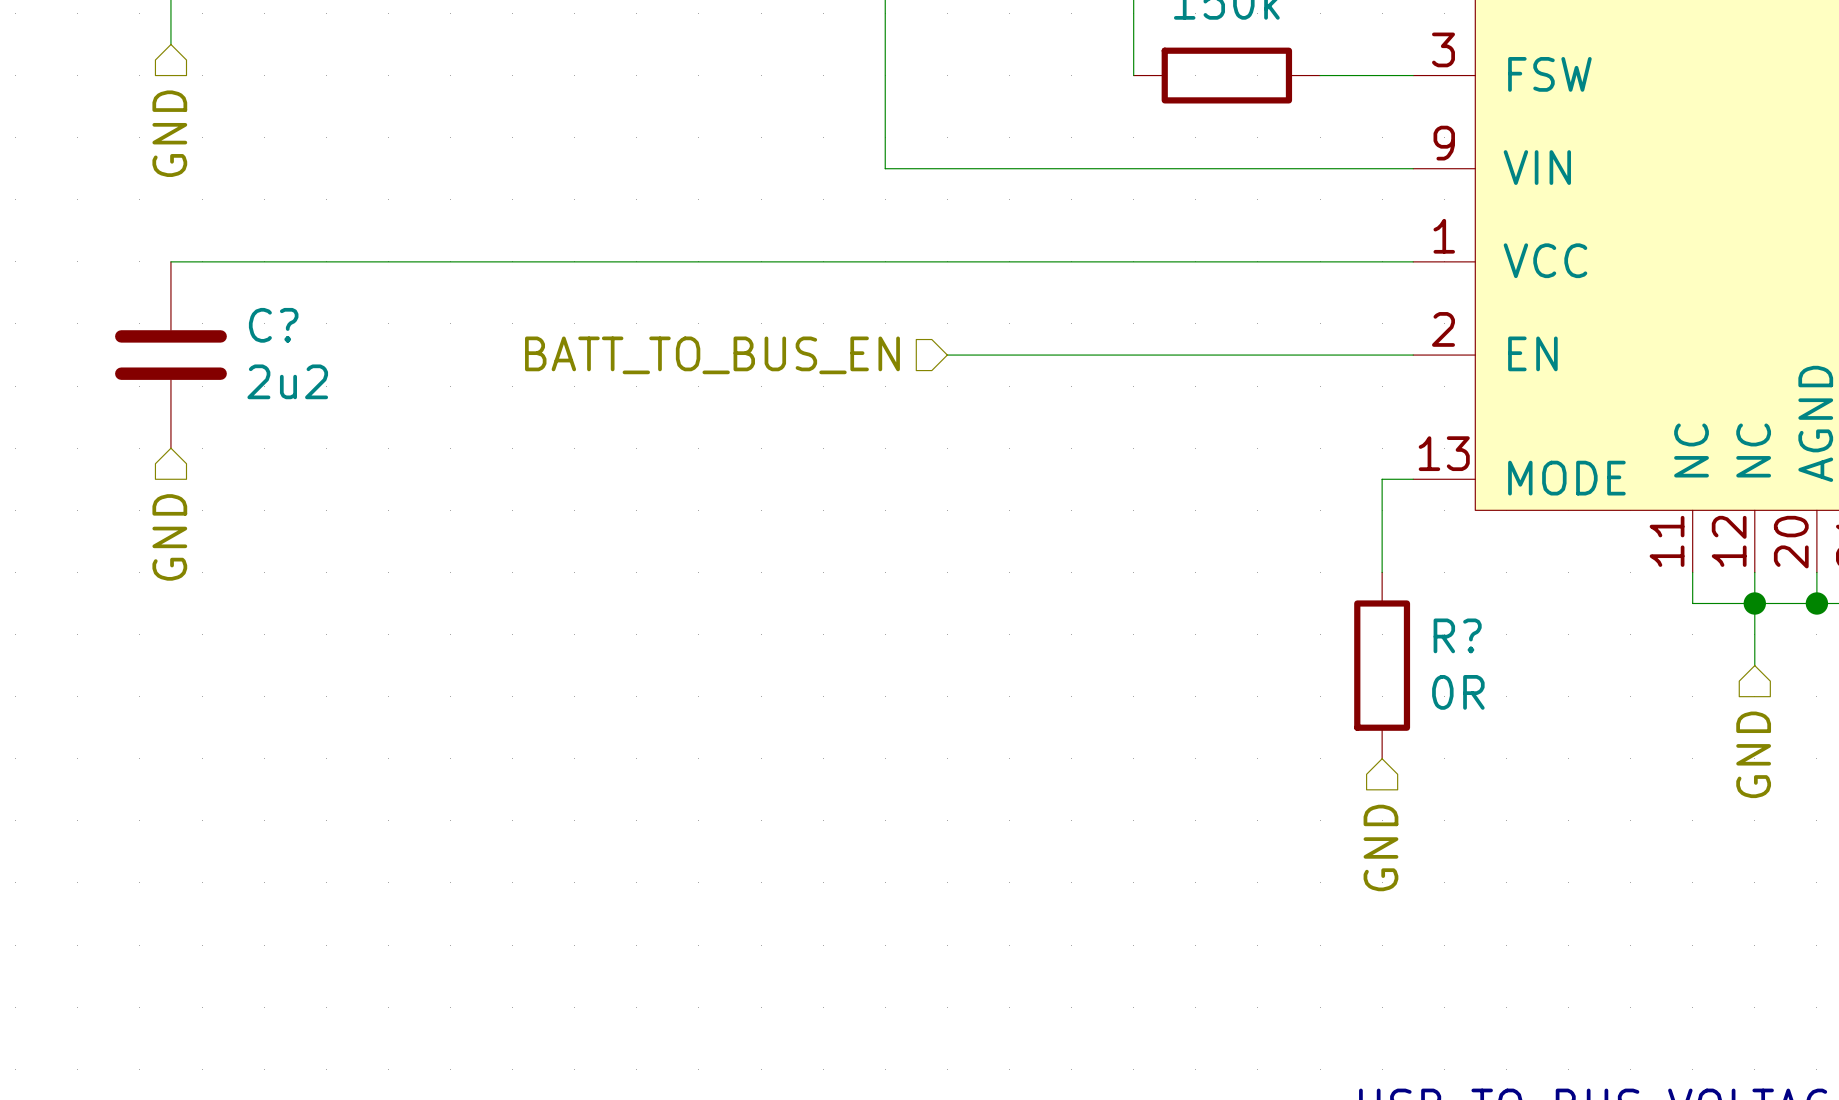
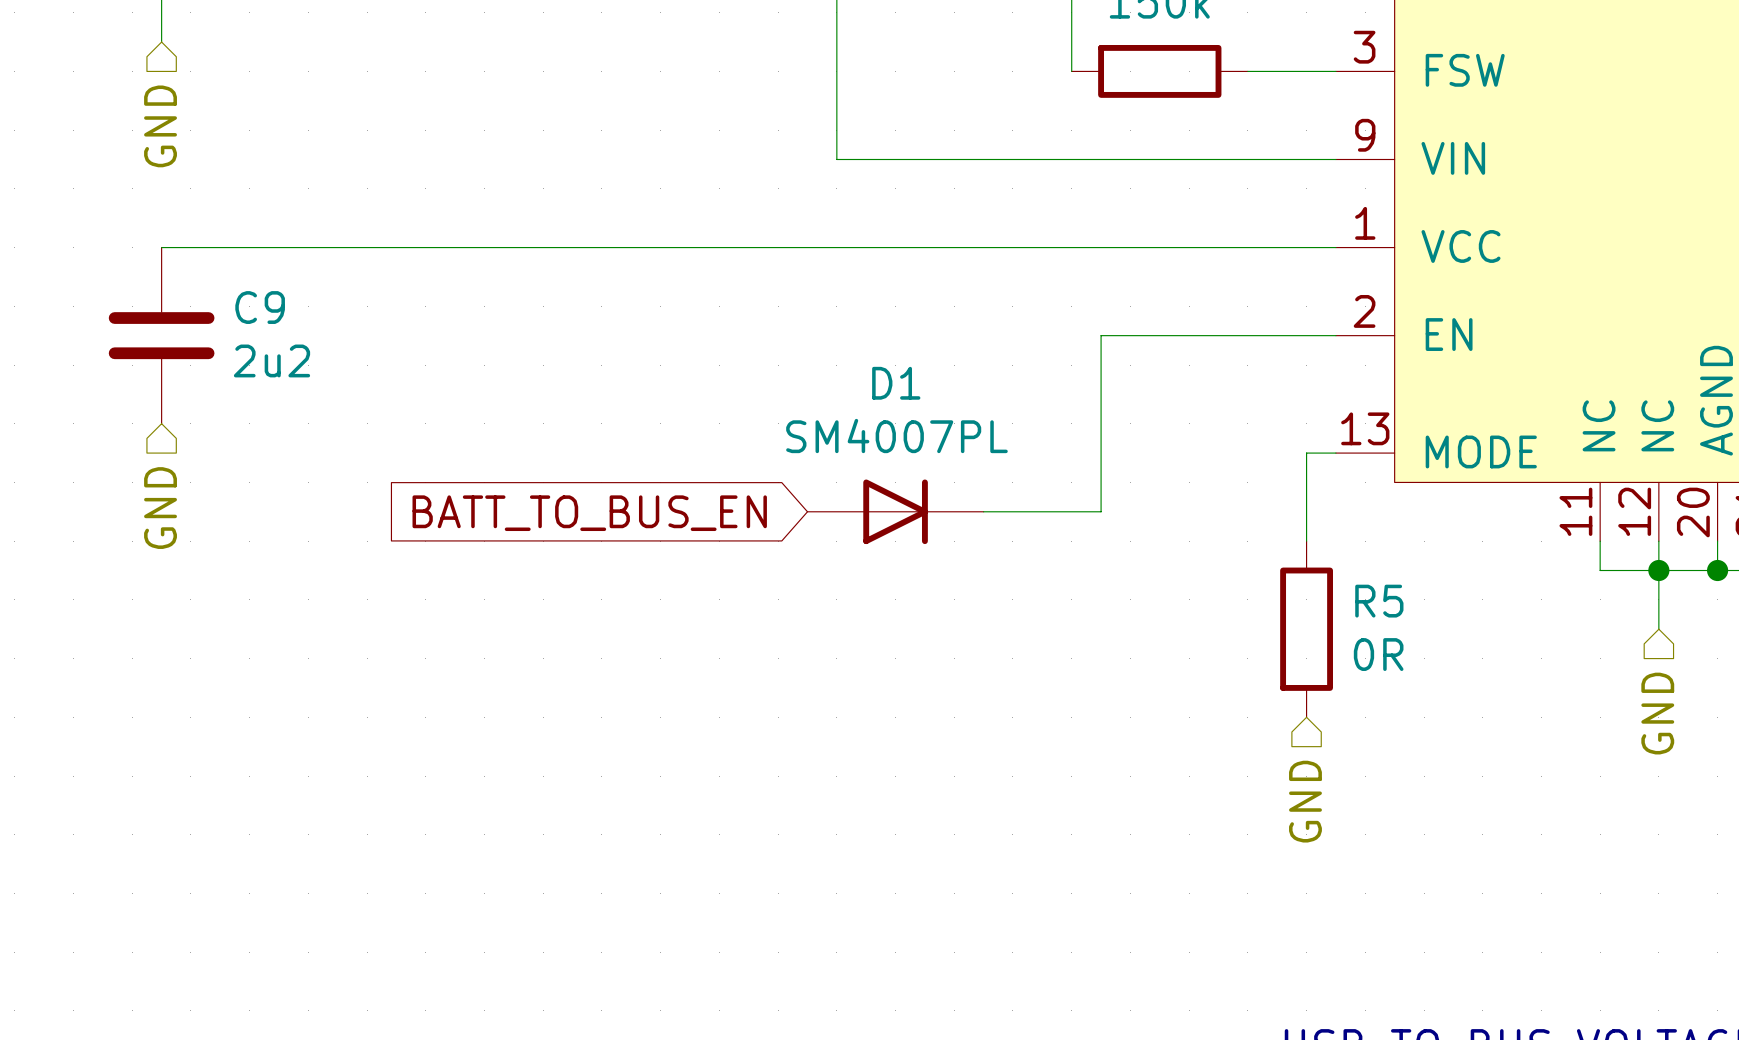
C? name: C? (273, 325) -> C9 (260, 307)
hierarchical label: BATT_TO_BUS_EN (712, 355) -> none
wire: (947, 355) (1164, 355) -> (983, 511) (1101, 511) (1101, 335)
D1: none -> SM4007PL (895, 511)
global label: none -> BATT_TO_BUS_EN (589, 513)
R? name: R? (1457, 635) -> R5 (1379, 601)

